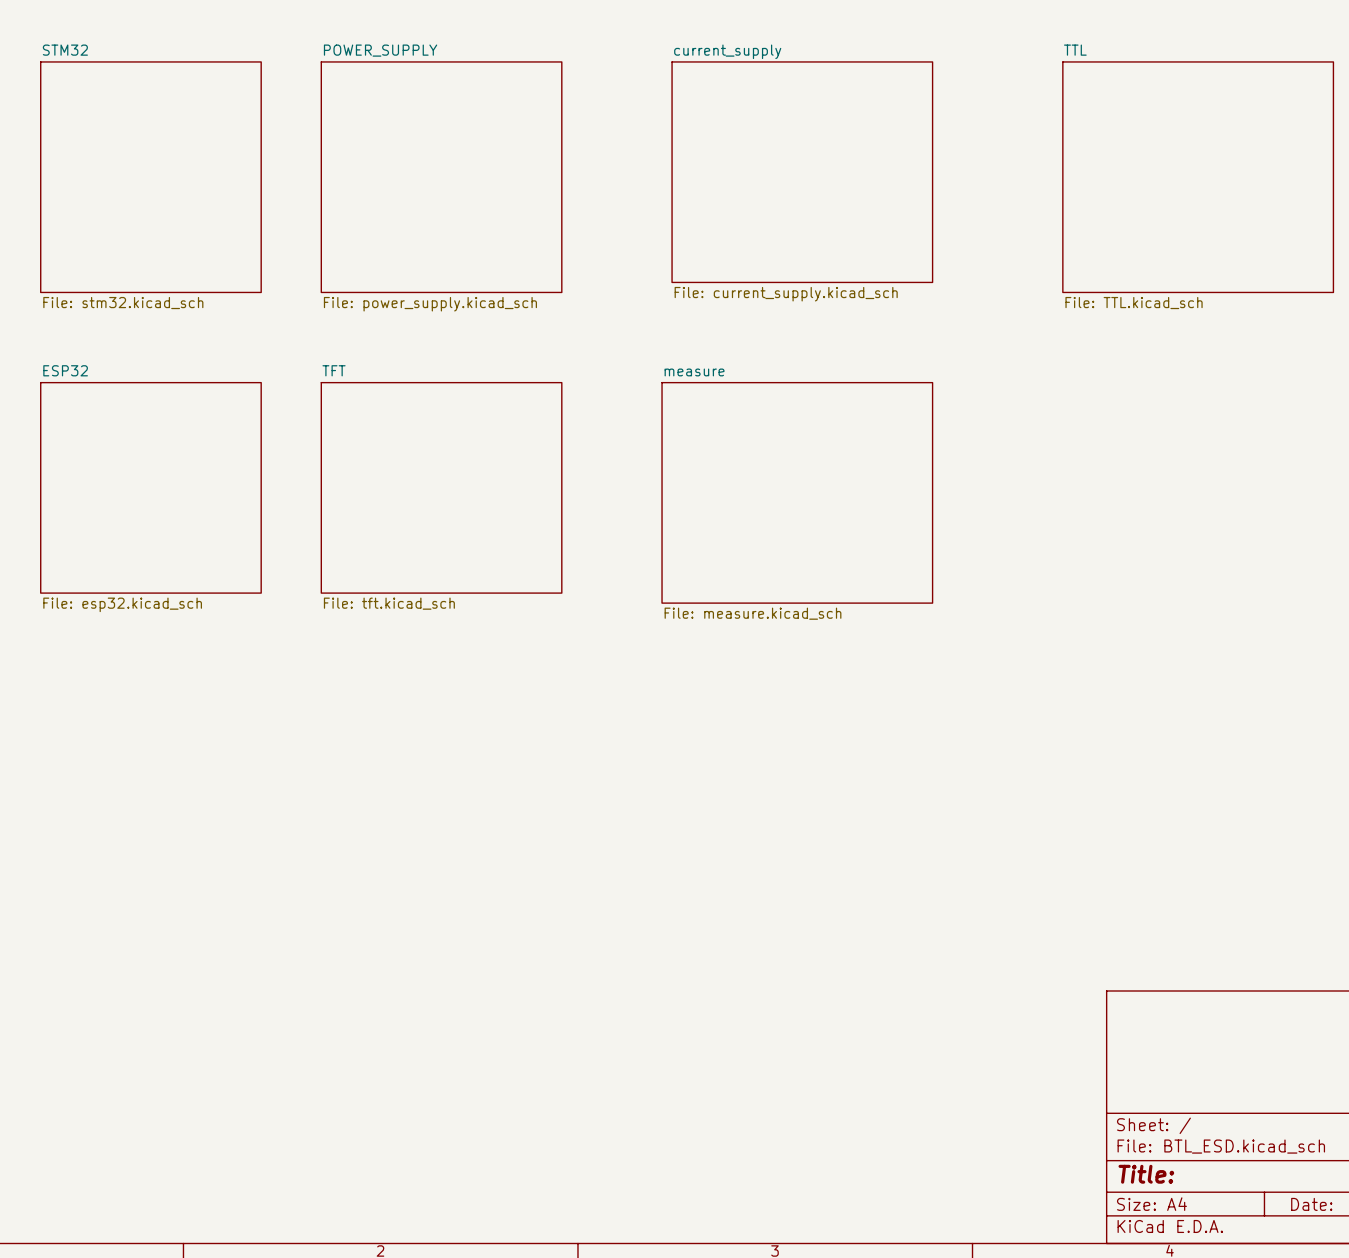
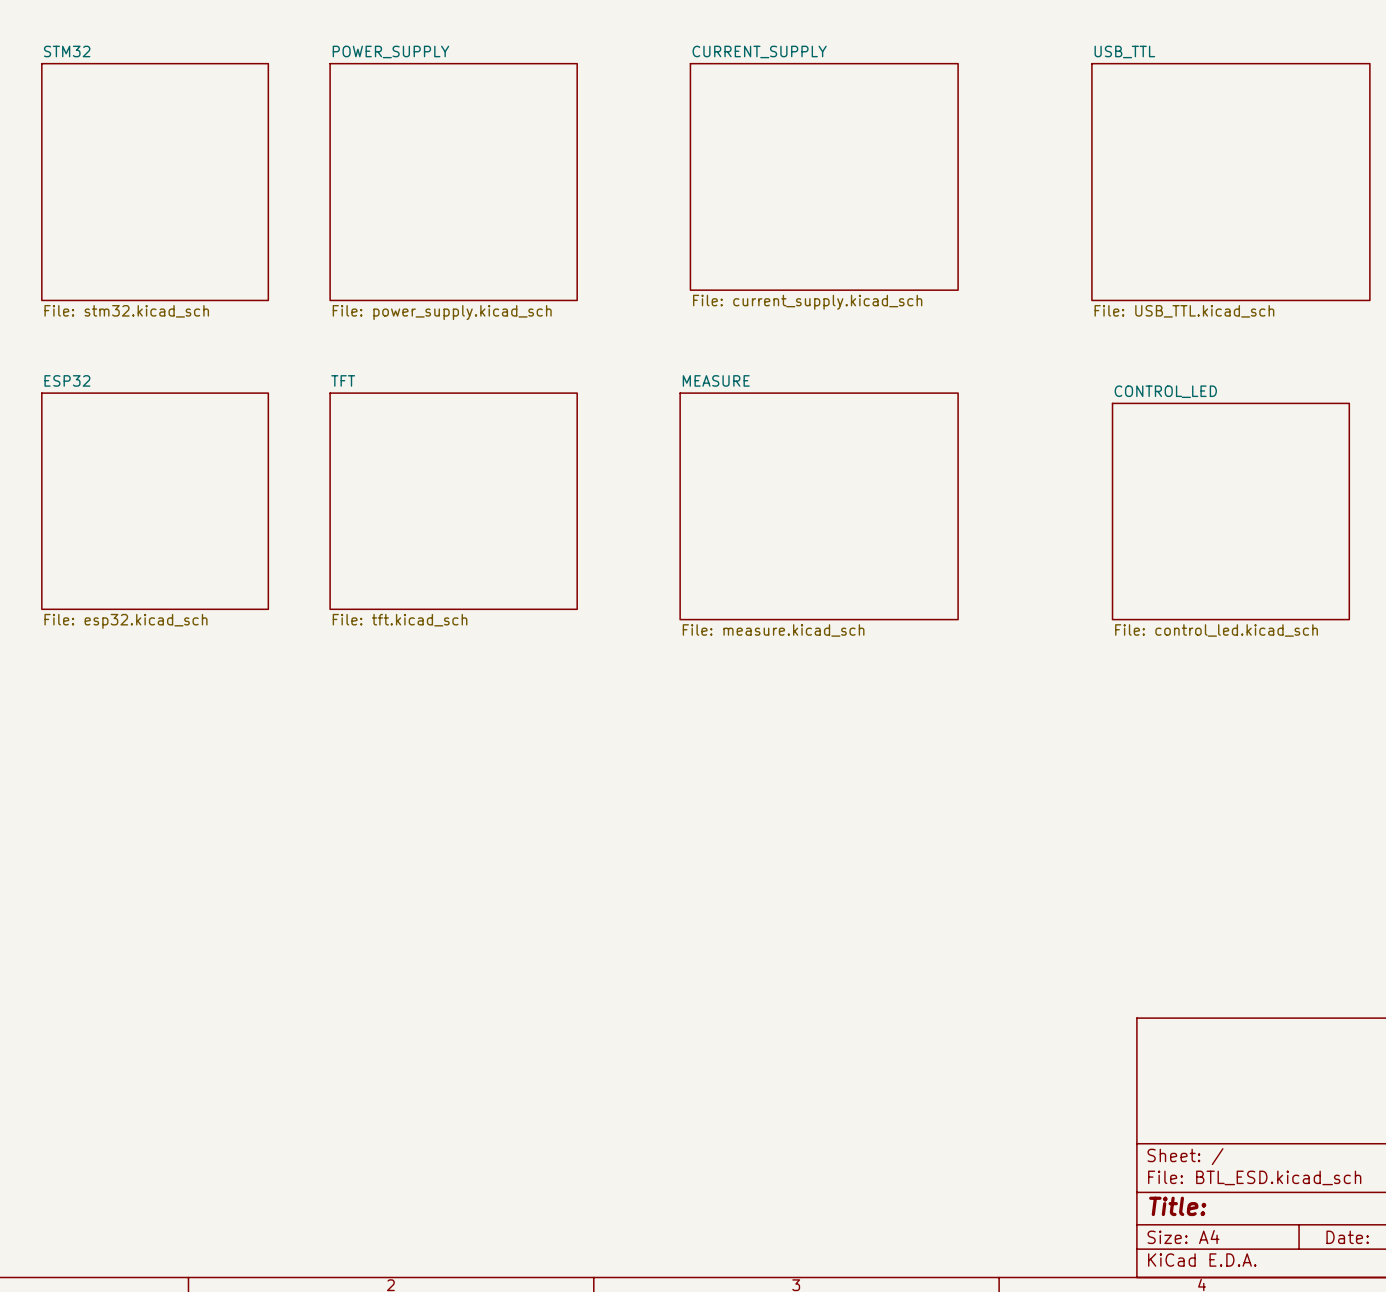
sheet TTL name: TTL (1075, 50) -> USB_TTL (1124, 51)
sheet current_supply name: current_supply (727, 51) -> CURRENT_SUPPLY (759, 51)
sheet TTL value: File: TTL.kicad_sch (1134, 303) -> File: USB_TTL.kicad_sch (1184, 311)
sheet measure name: measure (694, 372) -> MEASURE (716, 380)
sheet CONTROL_LED: none -> File: control_led.kicad_sch (1230, 511)

